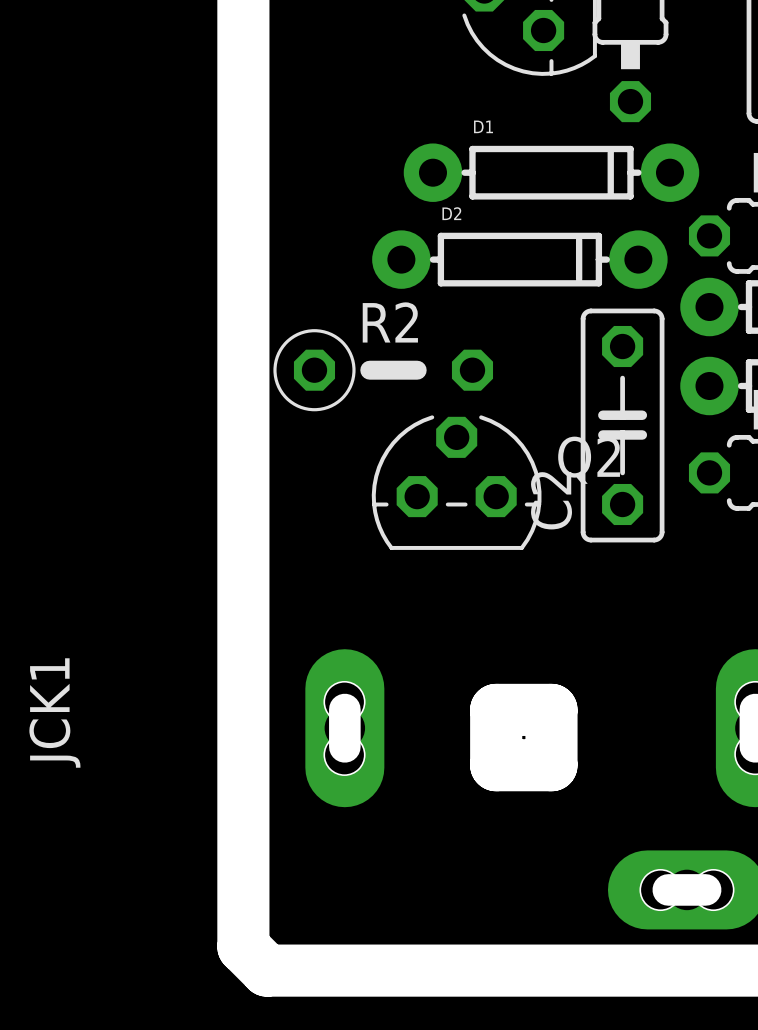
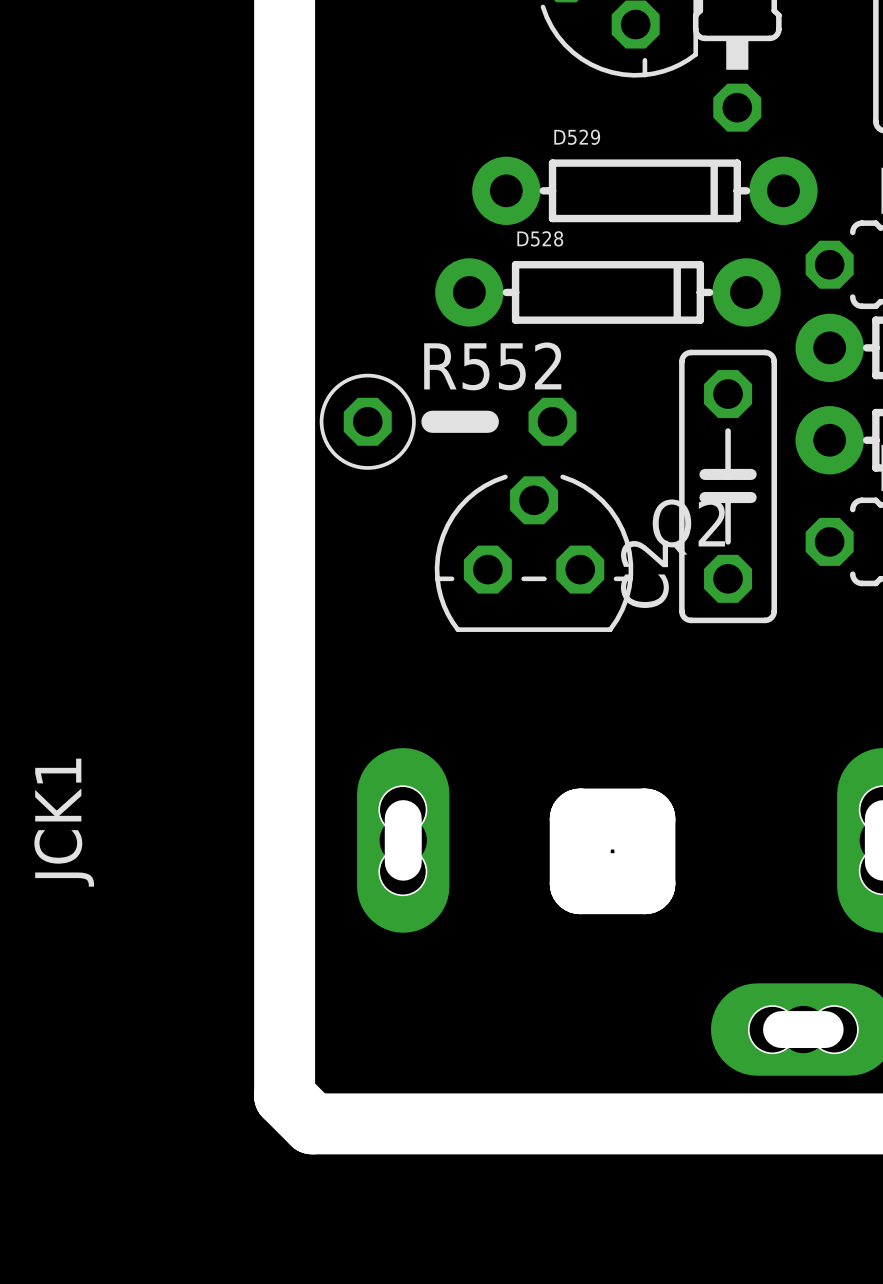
D1 name: D1 (483, 126) -> D529 (577, 137)
D2 name: D2 (451, 213) -> D528 (540, 238)
R2 name: R2 (390, 322) -> R552 (492, 366)

